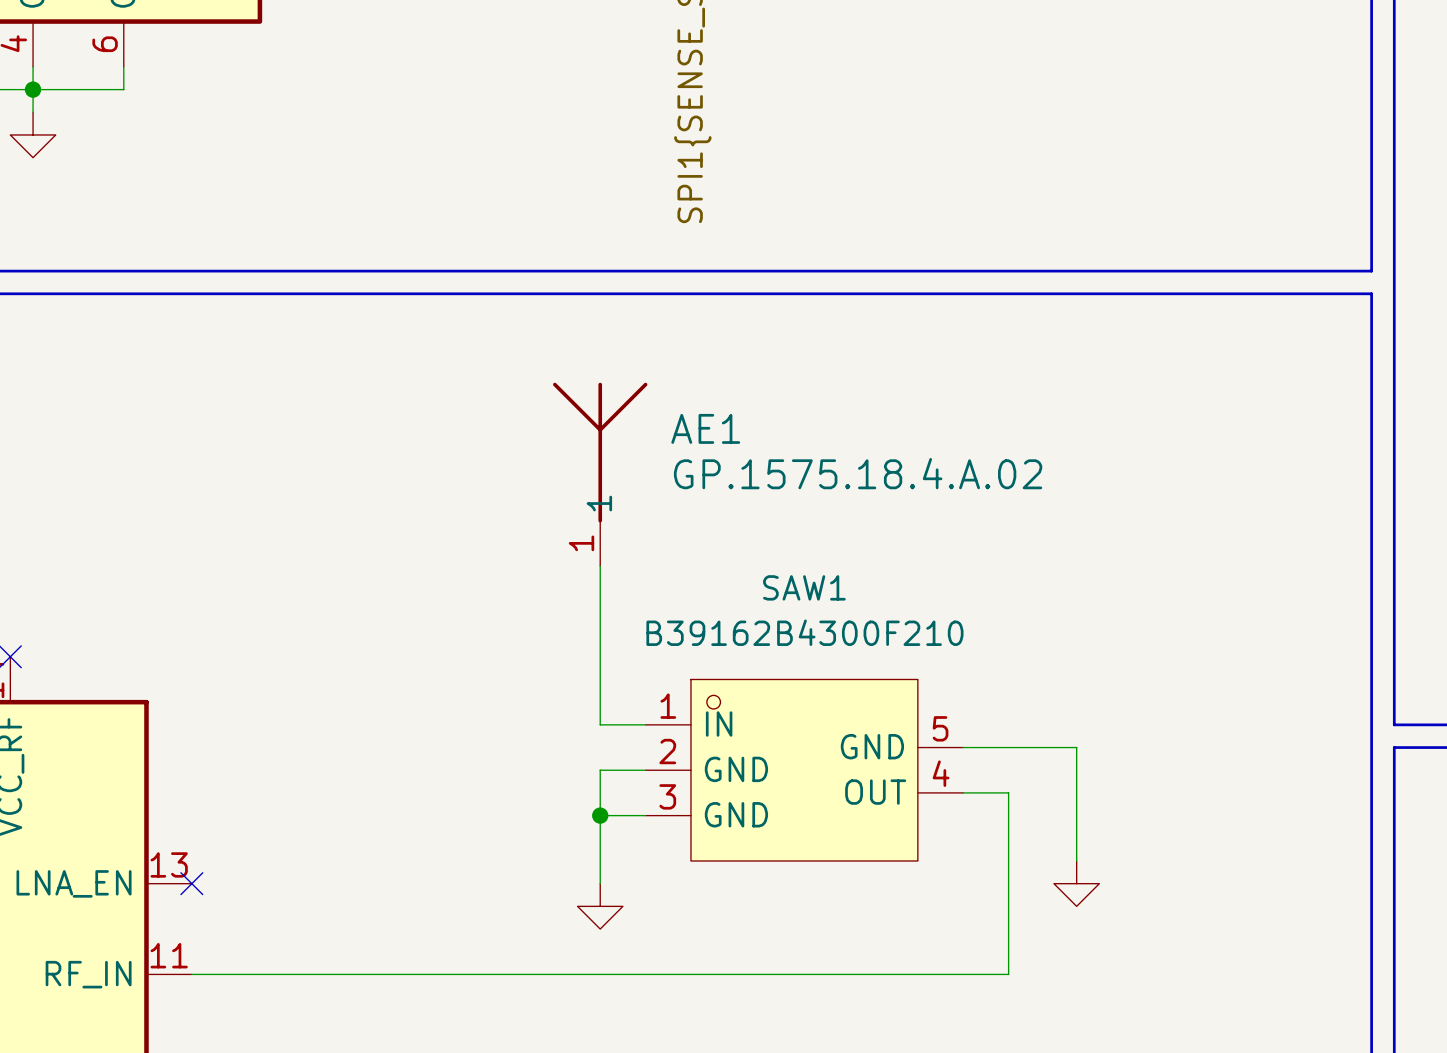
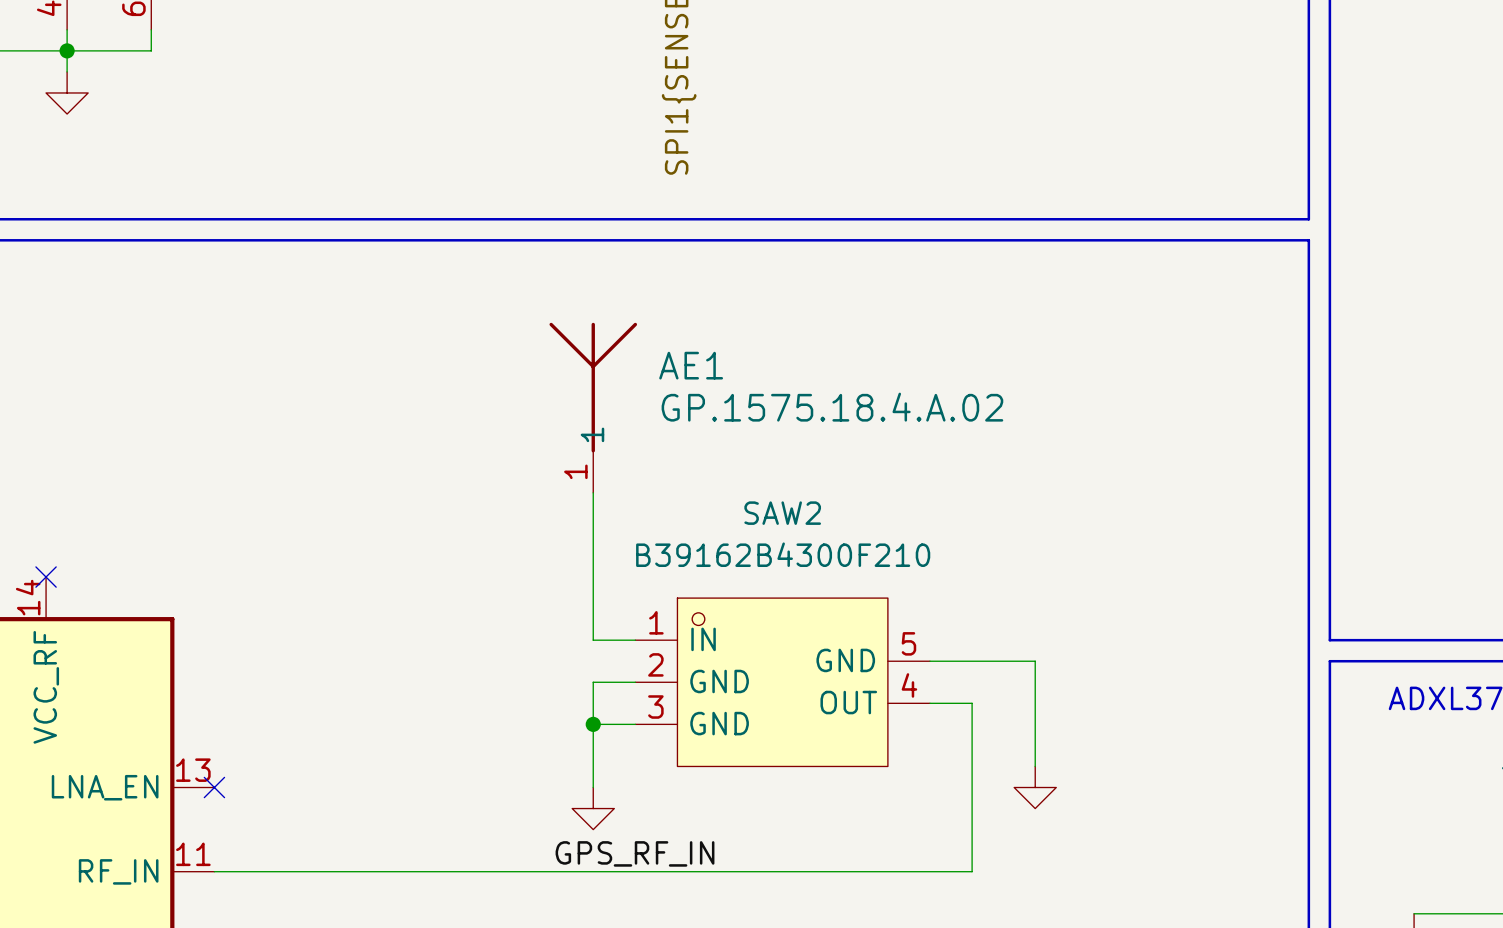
SAW1 name: SAW1 (804, 587) -> SAW2 (782, 513)
label: none -> GPS_RF_IN (635, 853)

